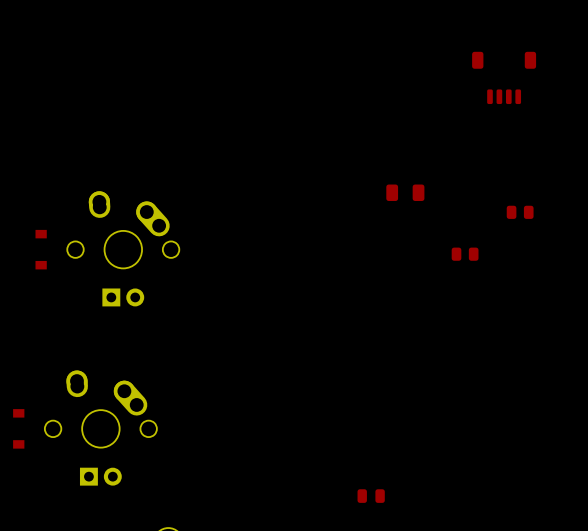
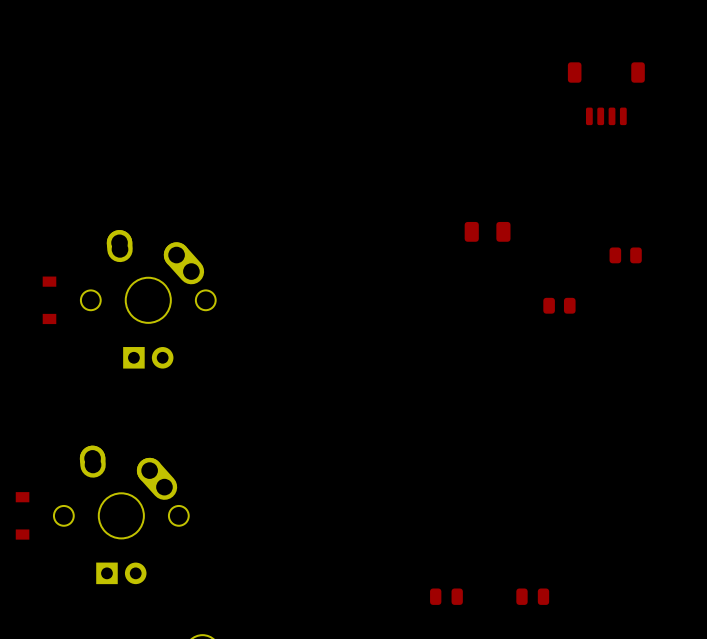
part: none -> (532, 596)

